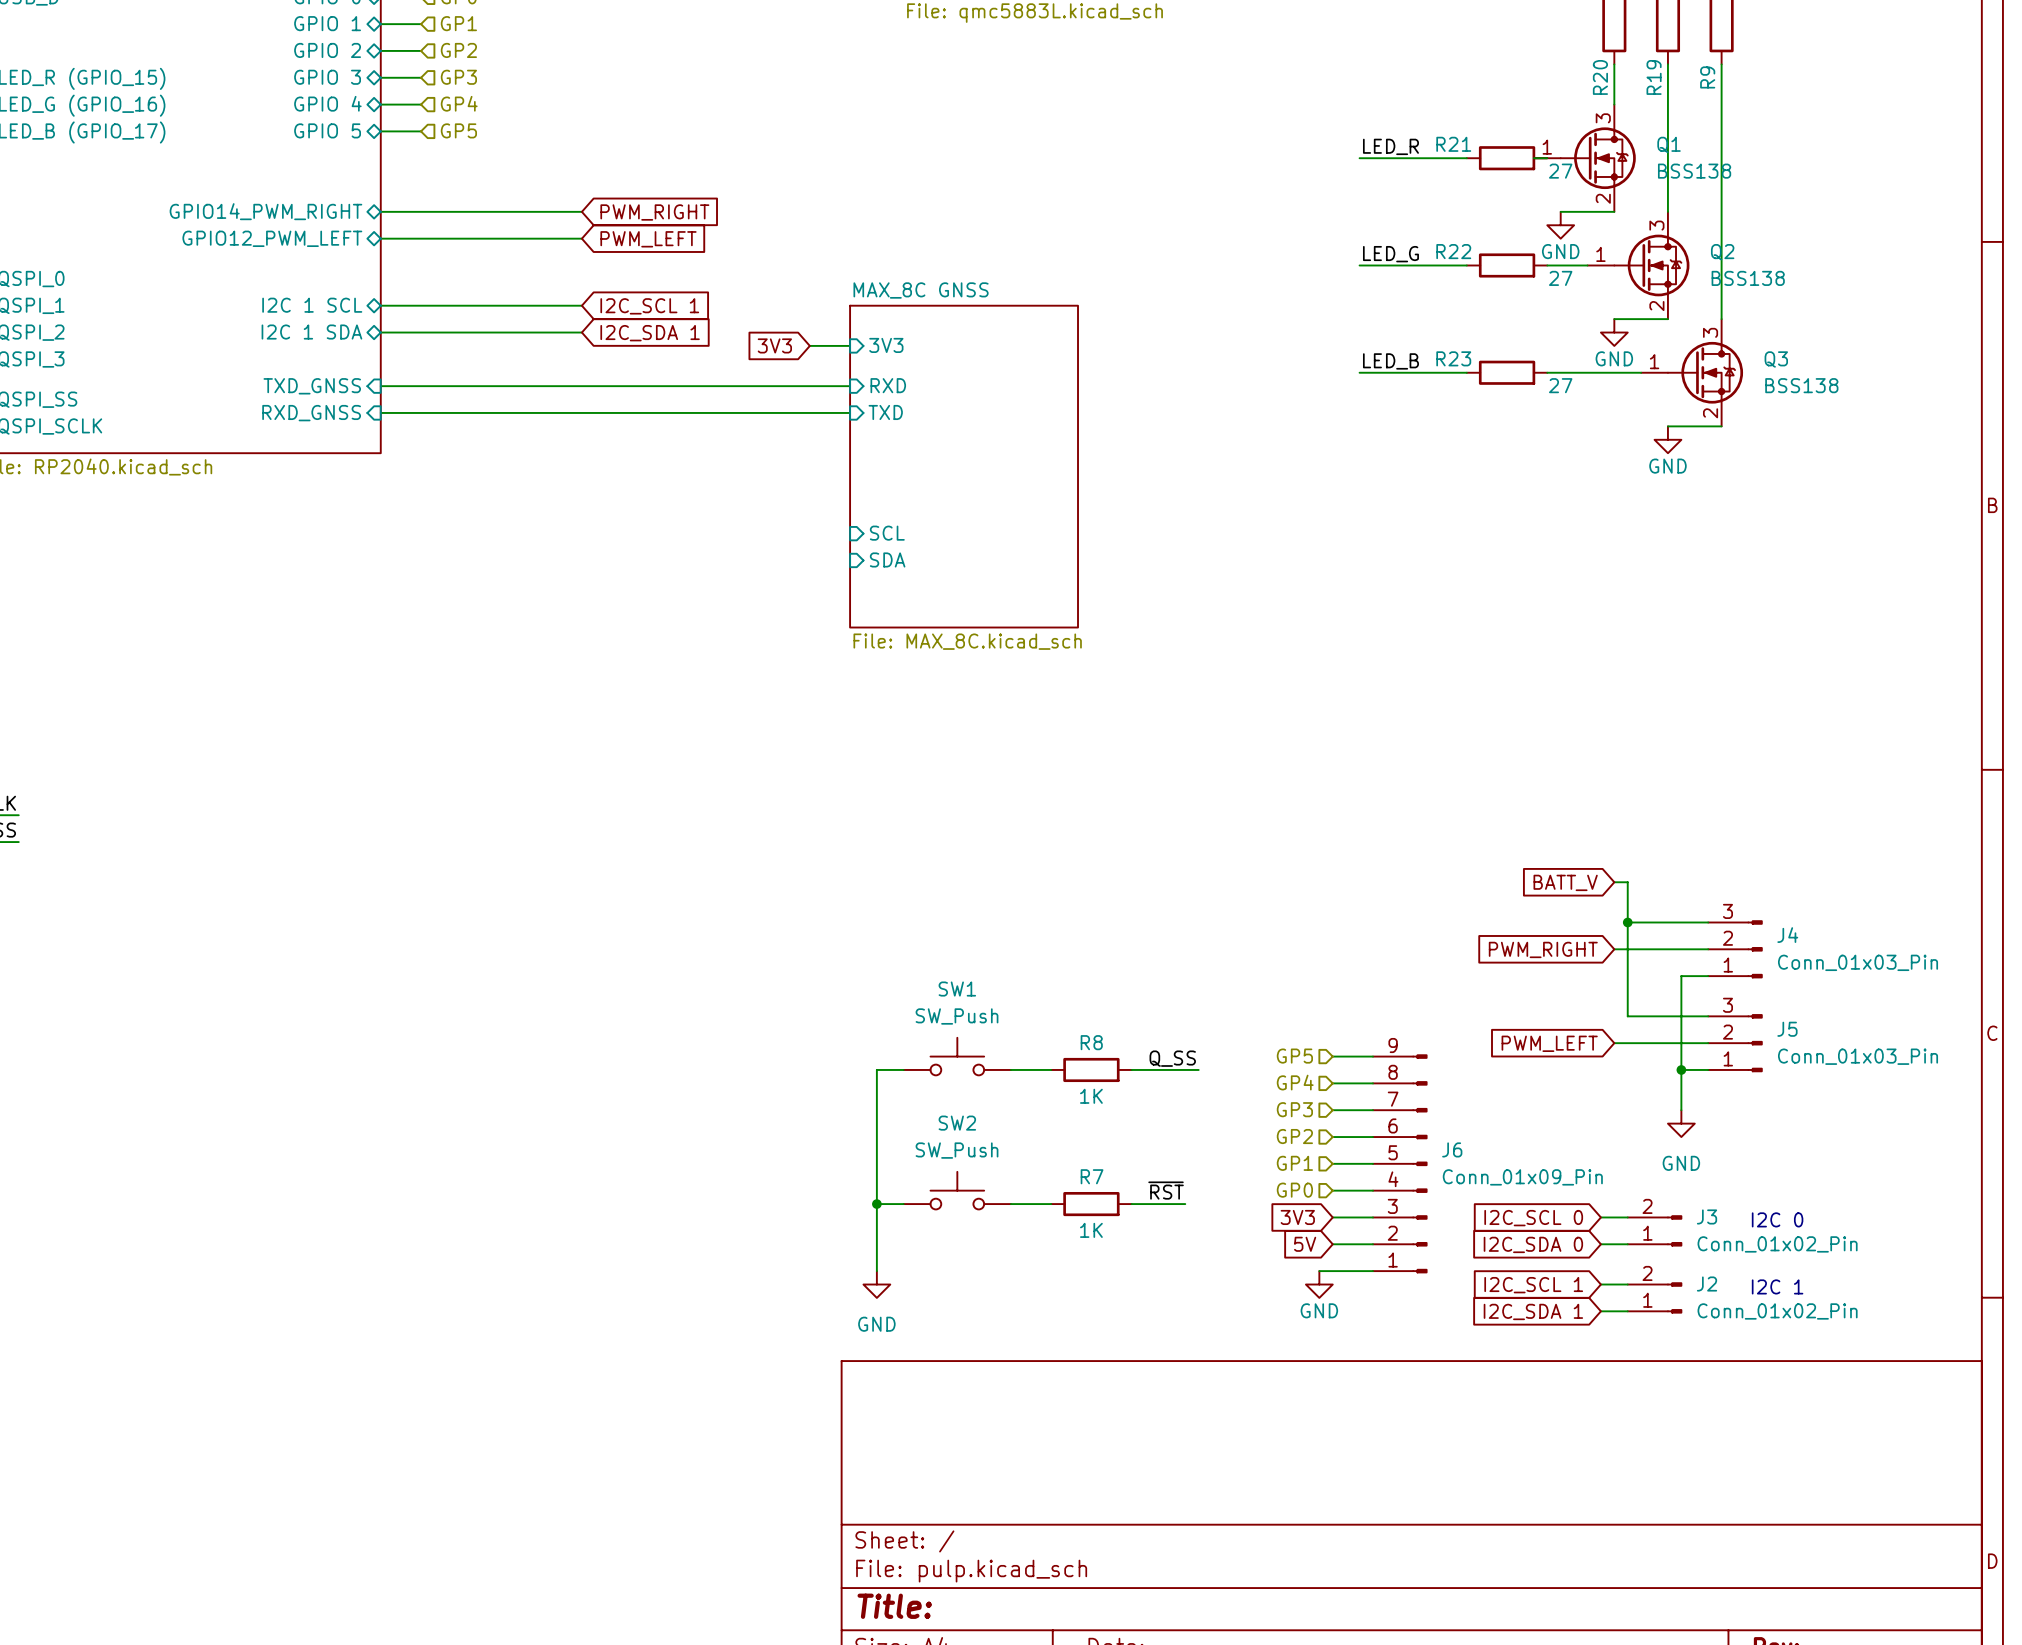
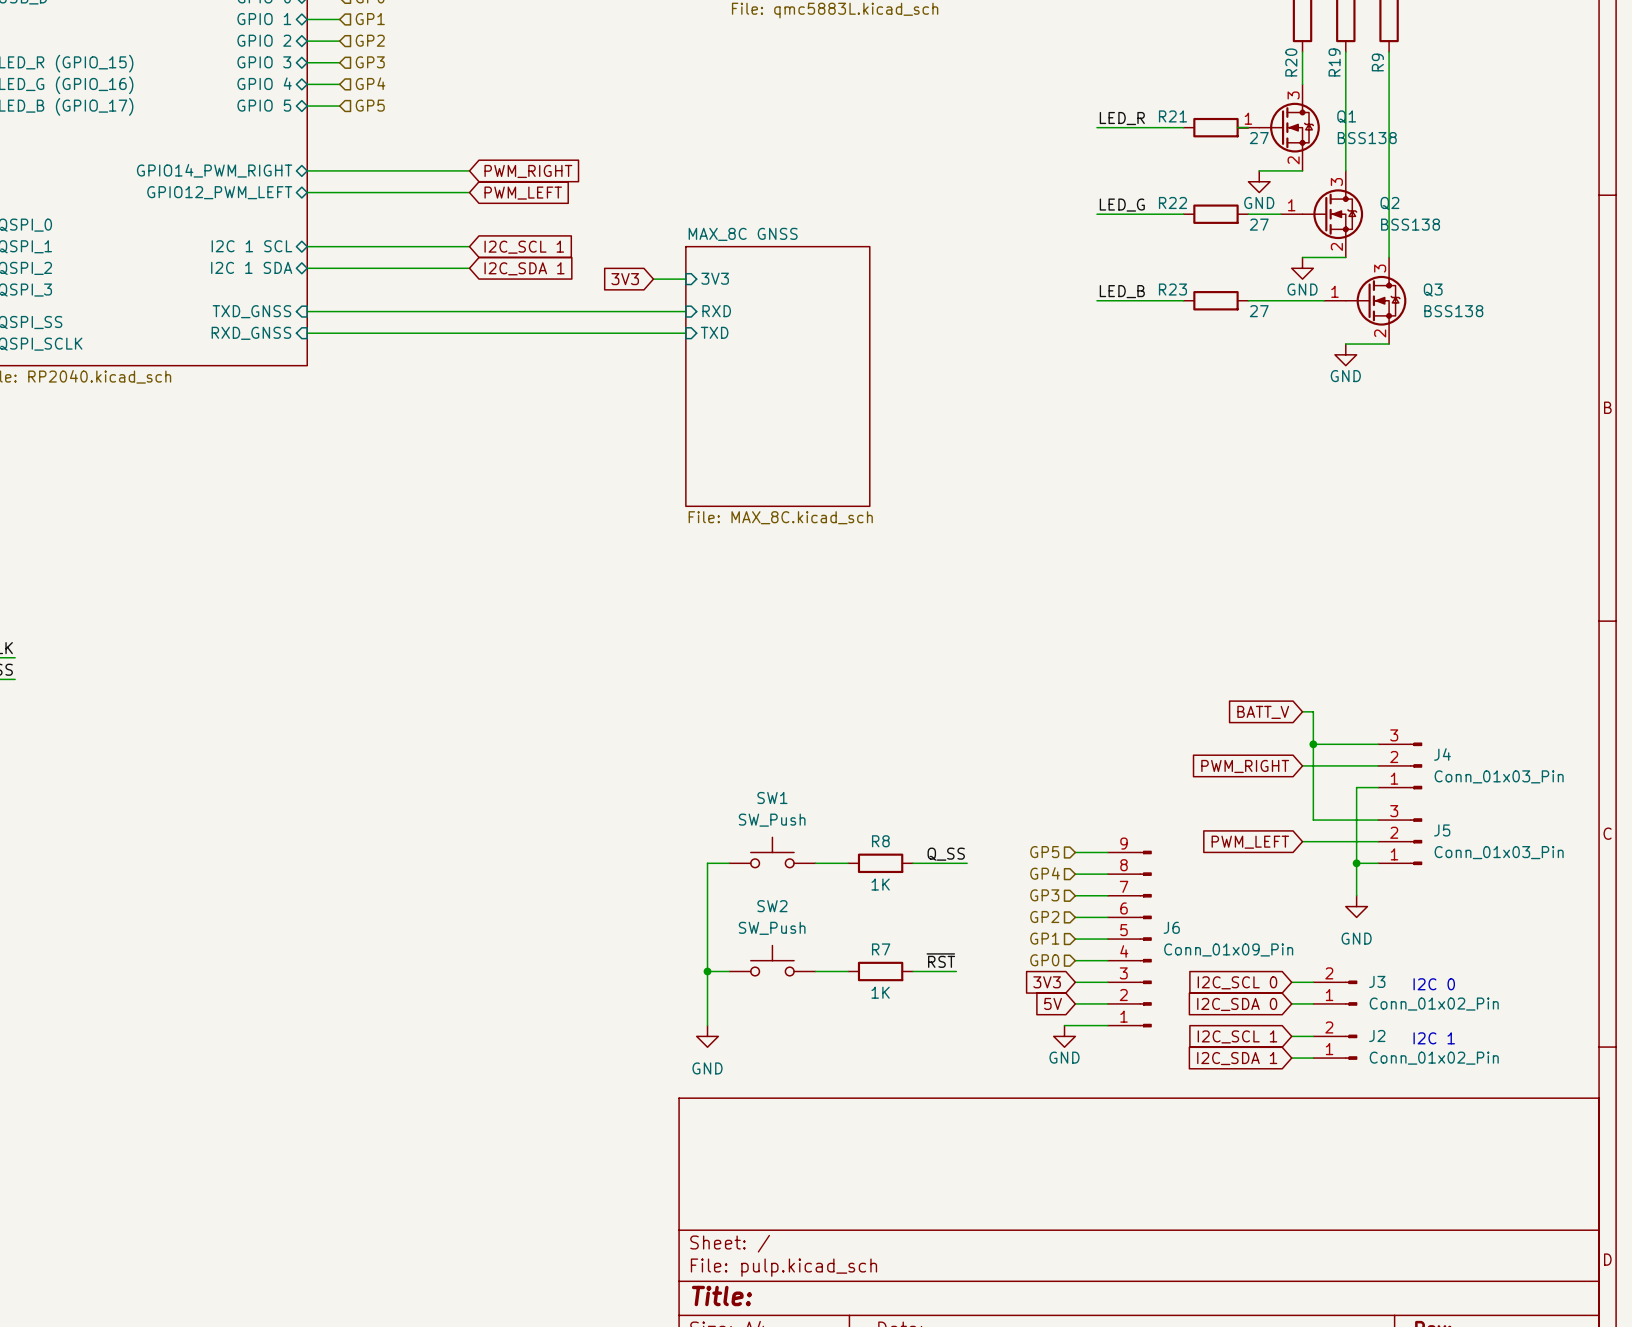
sheet pin: SCL (887, 533) -> none
sheet pin: SDA (887, 559) -> none

